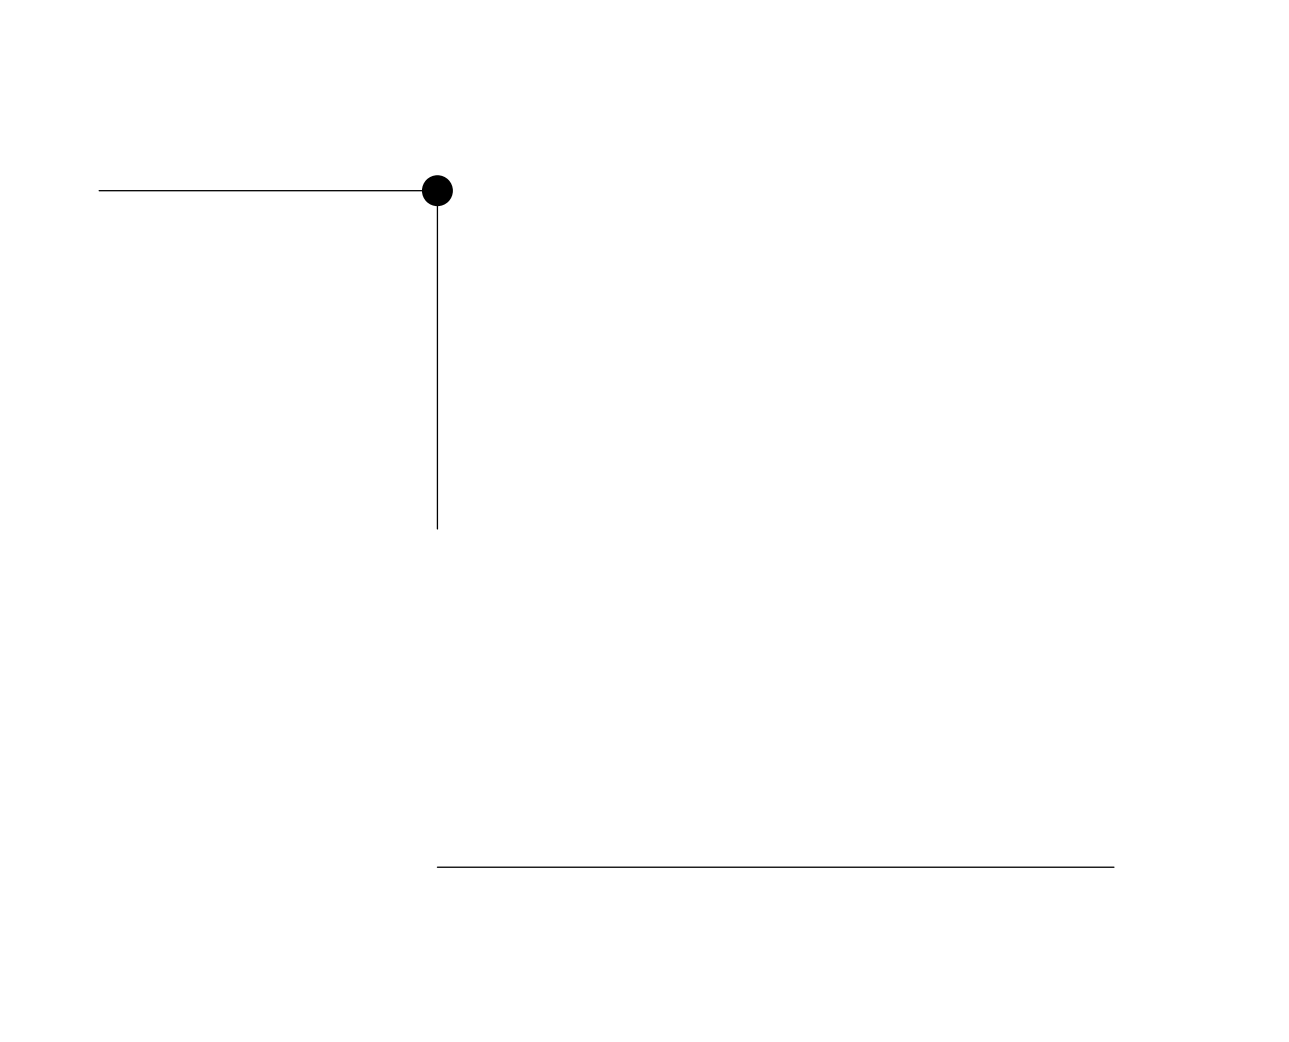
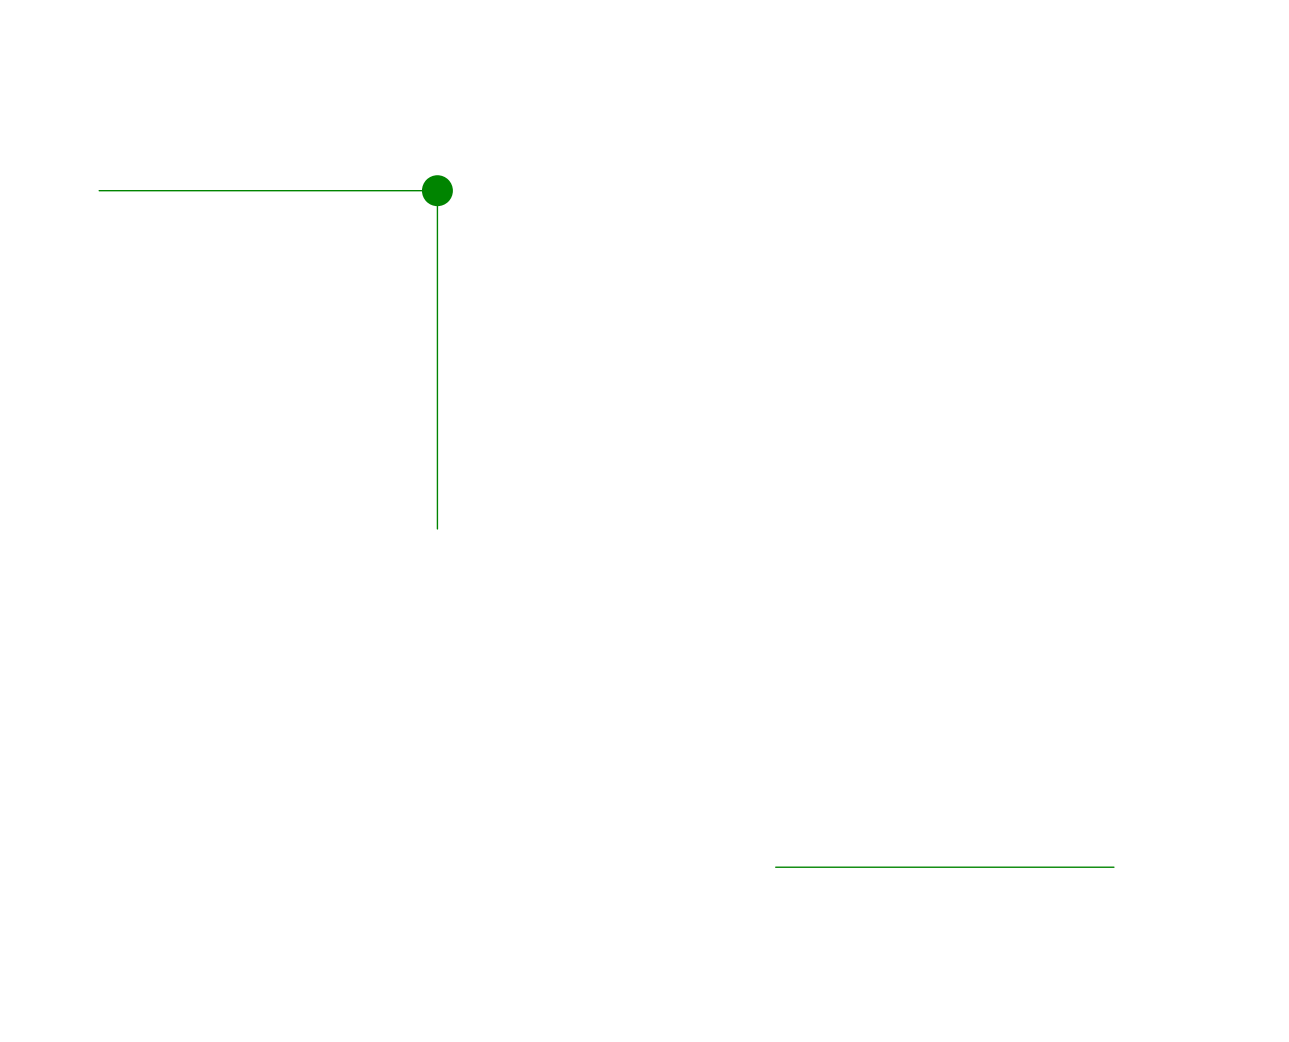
wire: (437, 867) (775, 867) -> none

